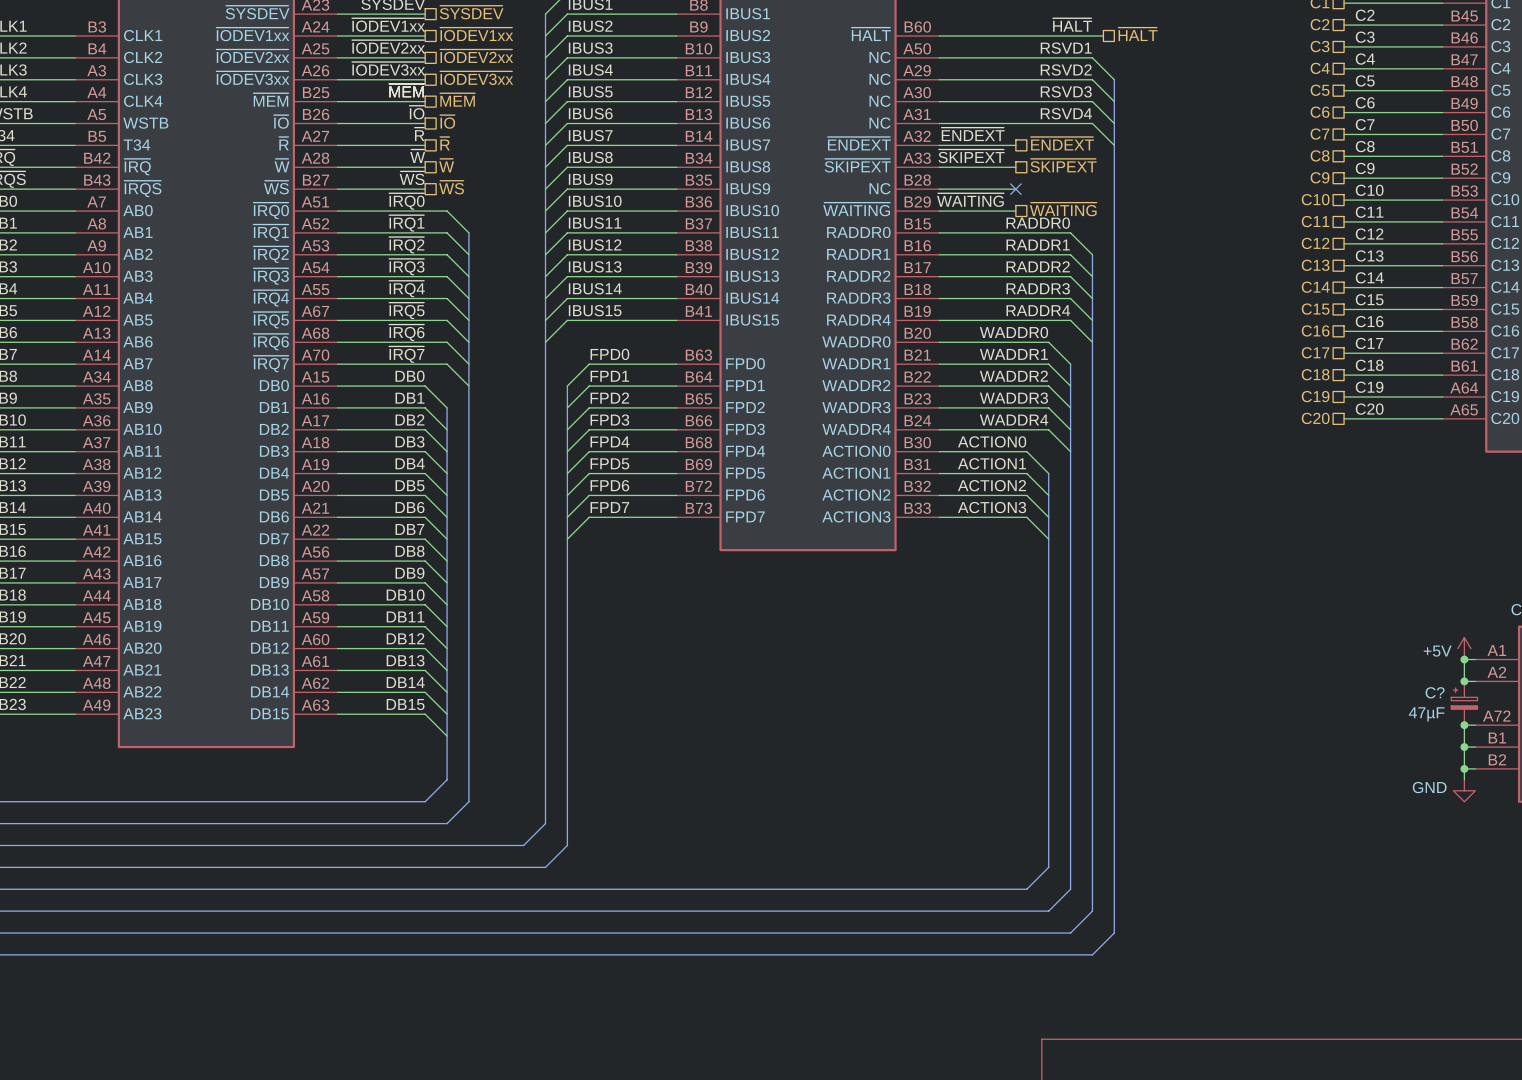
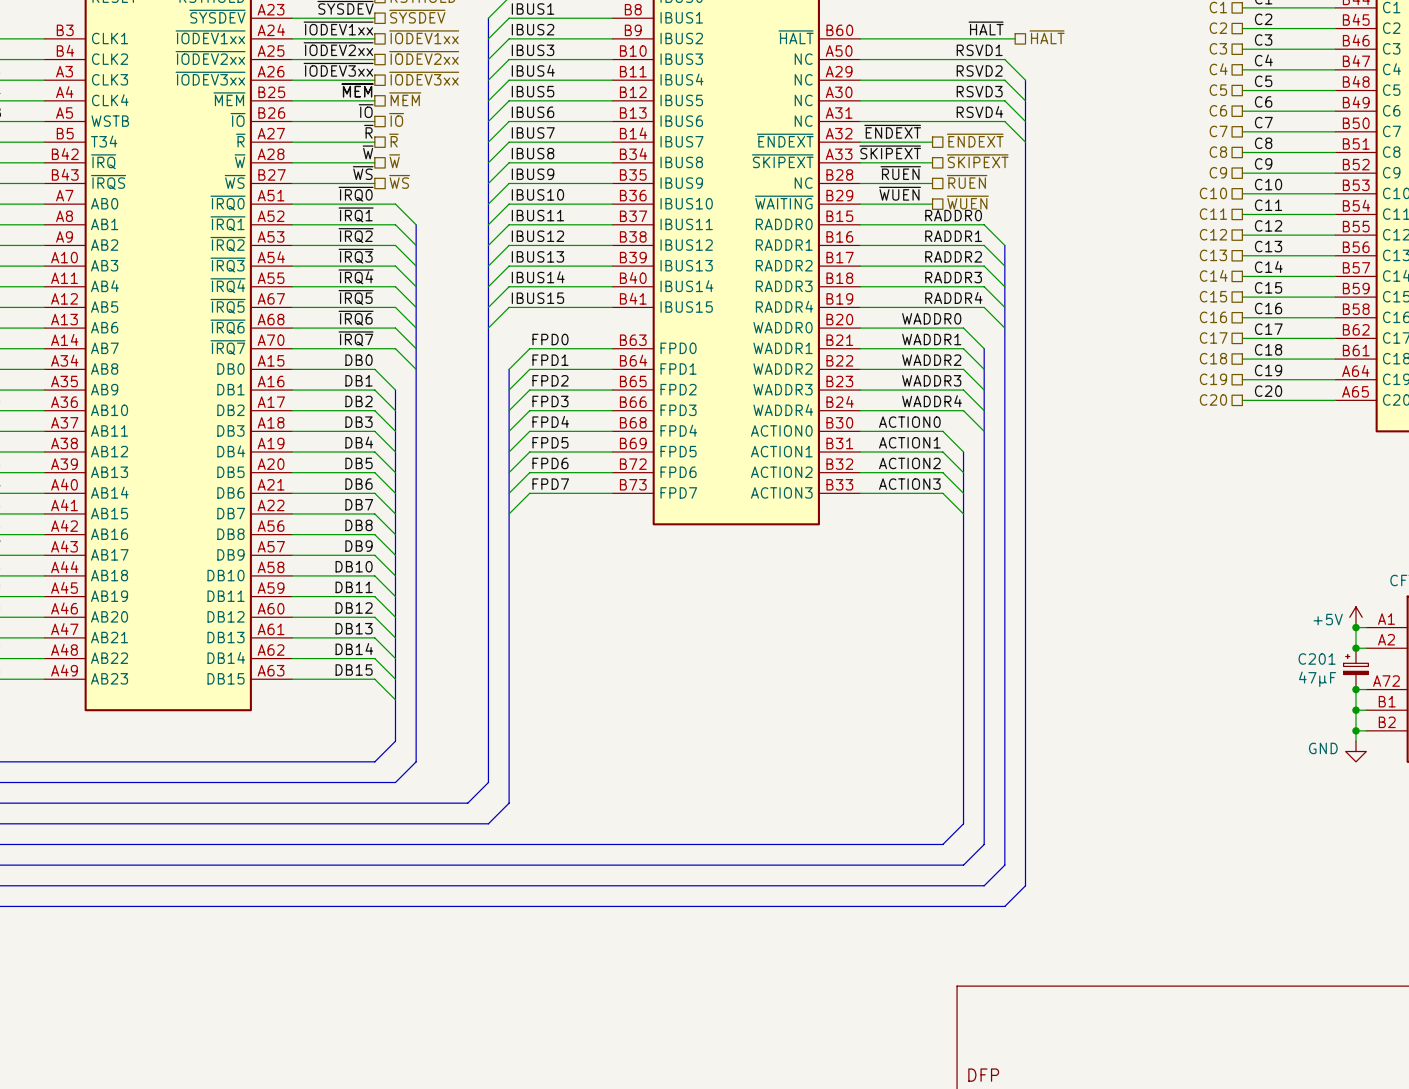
label: none -> ~{RUEN} (900, 173)
hierarchical label: none -> ~{RUEN} (967, 181)
no-connect mark: (1015, 189) -> none
label: ~{WAITING} (970, 200) -> ~{WUEN} (900, 193)
hierarchical label: ~{WAITING} (1063, 209) -> ~{WUEN} (967, 202)
C? name: C? (1435, 692) -> C201 (1317, 659)

